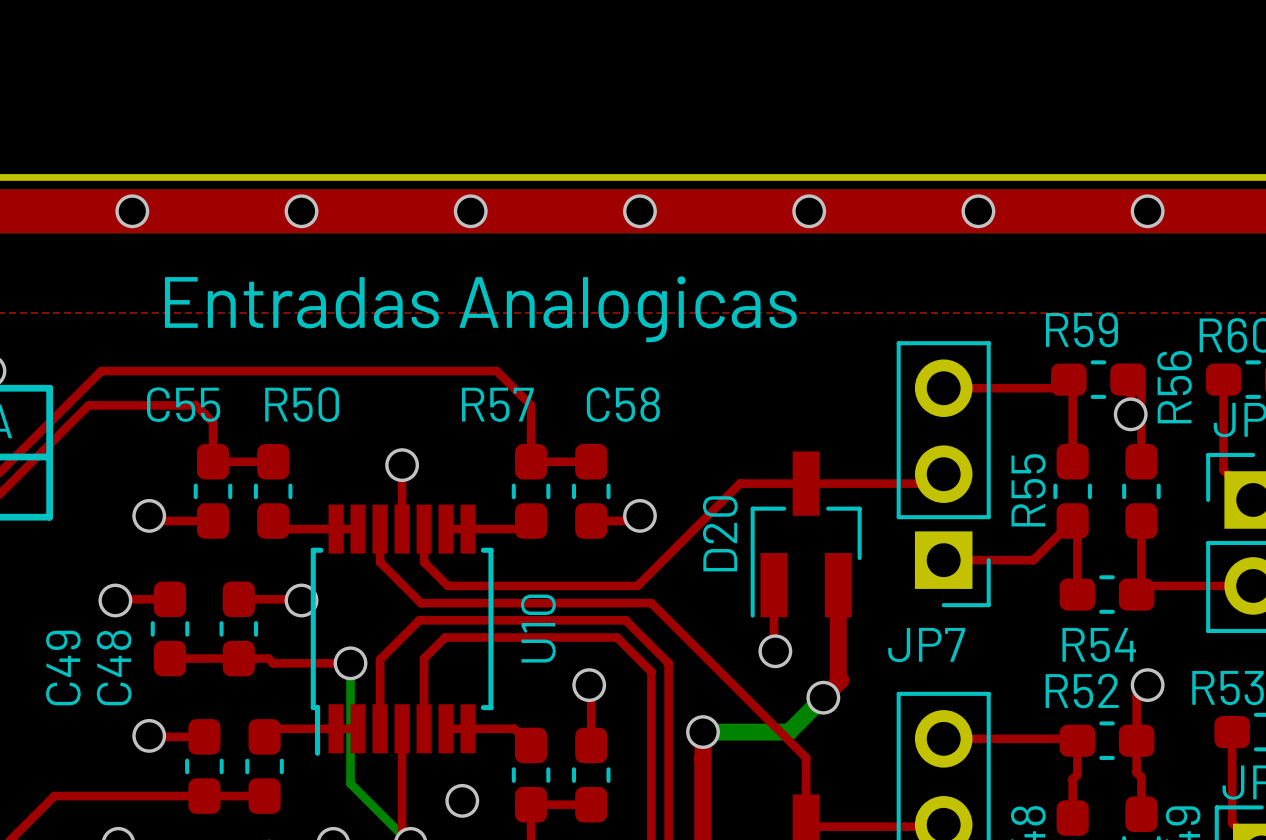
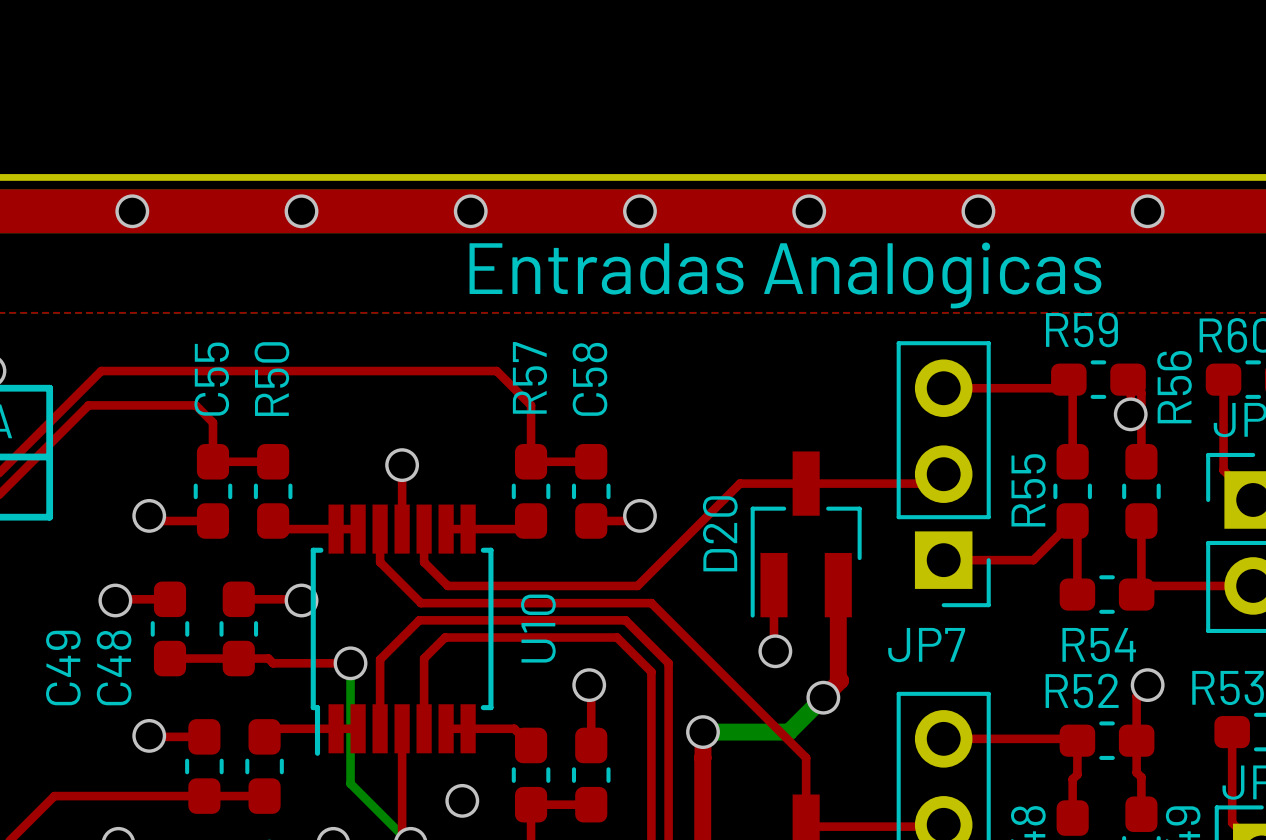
text position: Entradas Analogicas (480, 309) -> Entradas Analogicas (785, 275)
C55 name rotation: 0° (183, 404) -> 90° counterclockwise (211, 379)
R50 name rotation: 0° (302, 404) -> 90° counterclockwise (271, 379)
R57 name rotation: 0° (497, 404) -> 90° counterclockwise (529, 377)
C58 name rotation: 0° (623, 404) -> 90° counterclockwise (589, 379)

